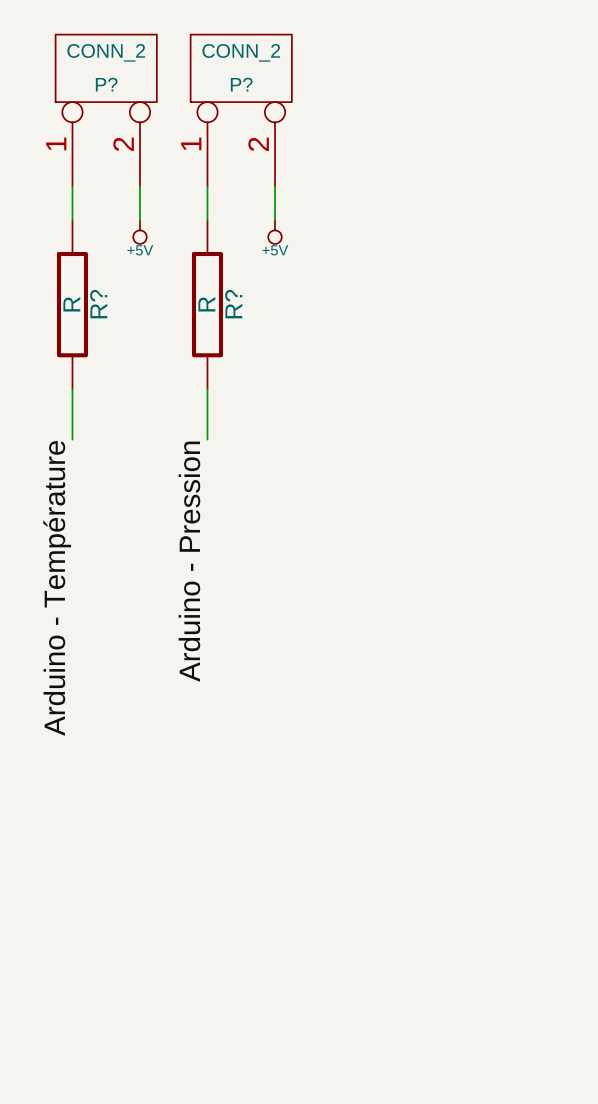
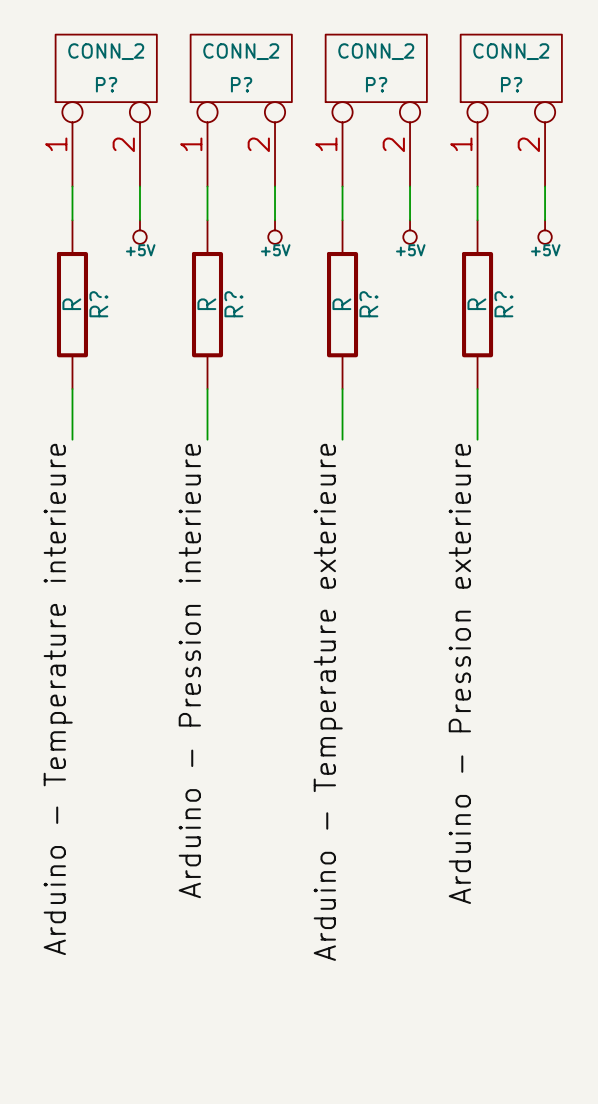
P?: none -> CONN_2 (376, 110)
P?: none -> CONN_2 (511, 110)
wire: none -> (342, 186) (342, 220)
wire: none -> (410, 186) (410, 220)
wire: none -> (477, 186) (477, 220)
wire: none -> (545, 186) (545, 220)
power symbol: none -> +5V (410, 232)
power symbol: none -> +5V (545, 232)
R?: none -> R (342, 304)
R?: none -> R (477, 304)
wire: none -> (342, 389) (342, 439)
wire: none -> (477, 389) (477, 439)
label: Arduino - Pression (189, 561) -> Arduino - Pression interieure (189, 671)
label: Arduino - Température (57, 588) -> Arduino - Temperature interieure (58, 699)
label: none -> Arduino - Pression exterieure (459, 673)
label: none -> Arduino - Temperature exterieure (328, 702)

